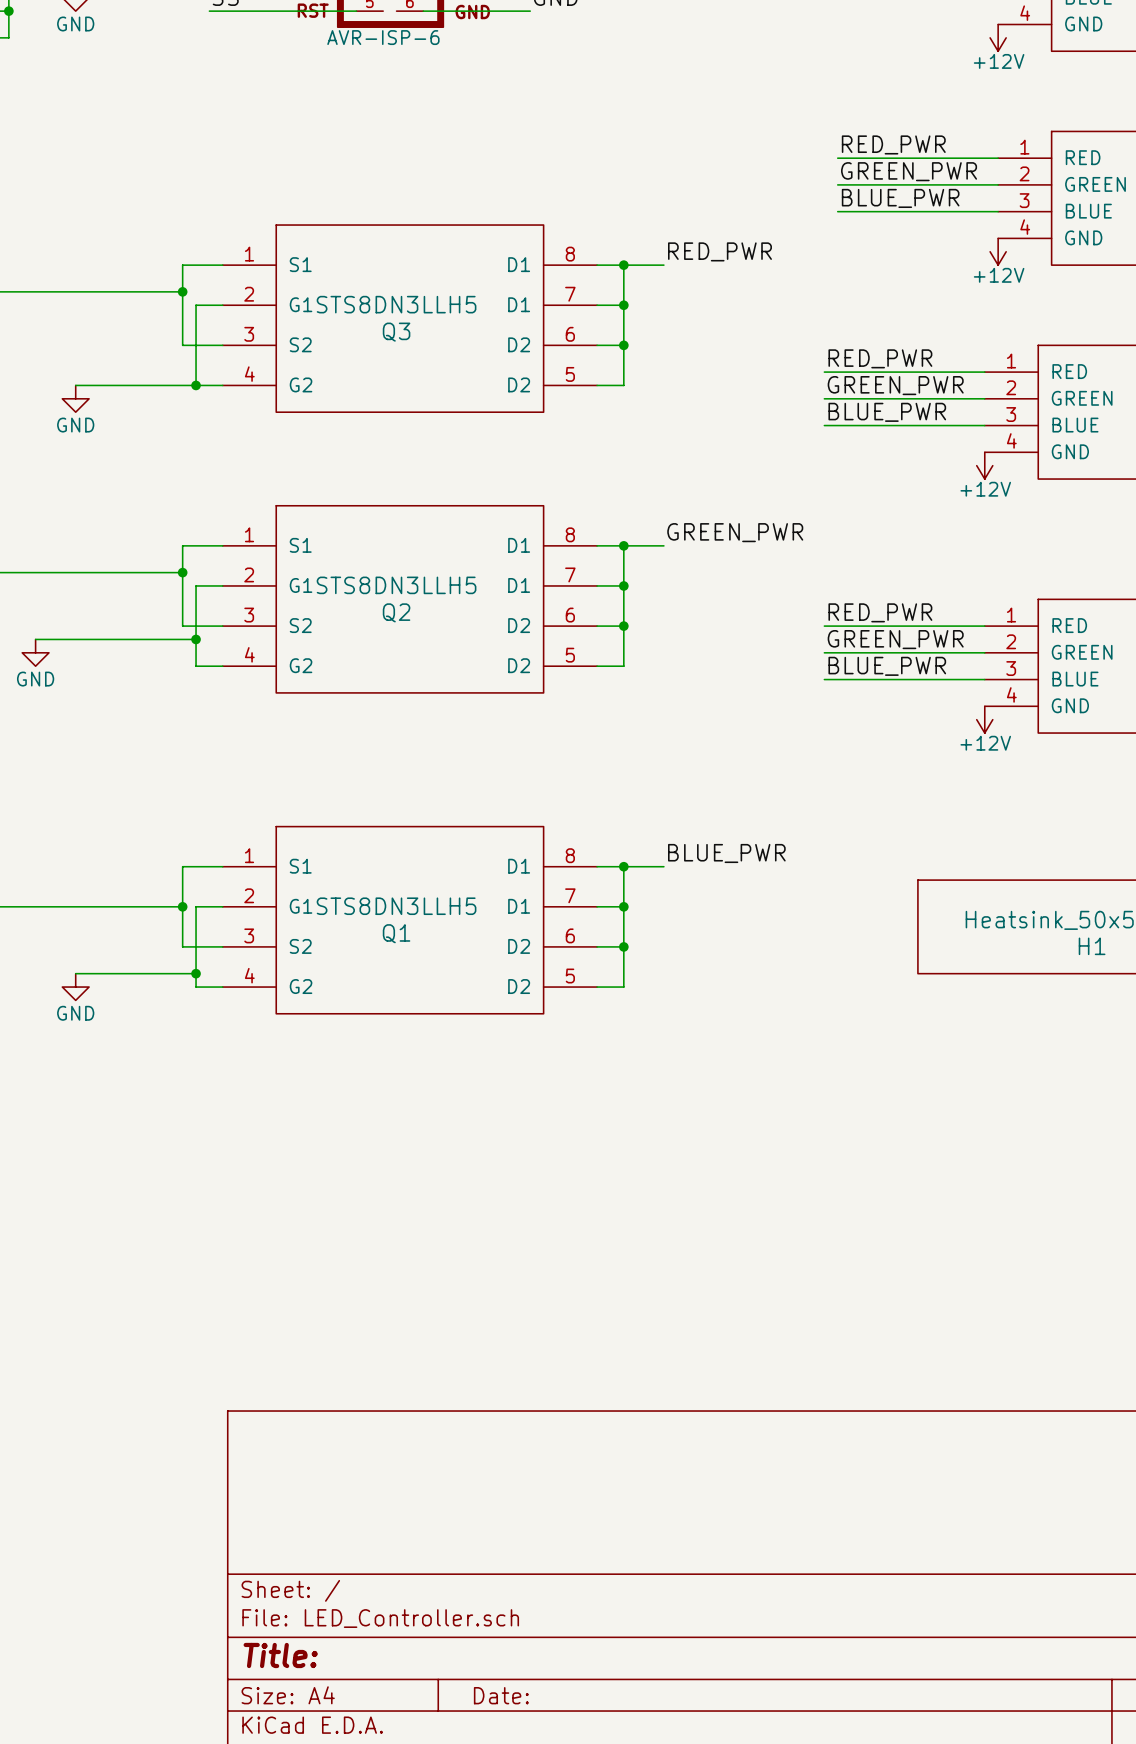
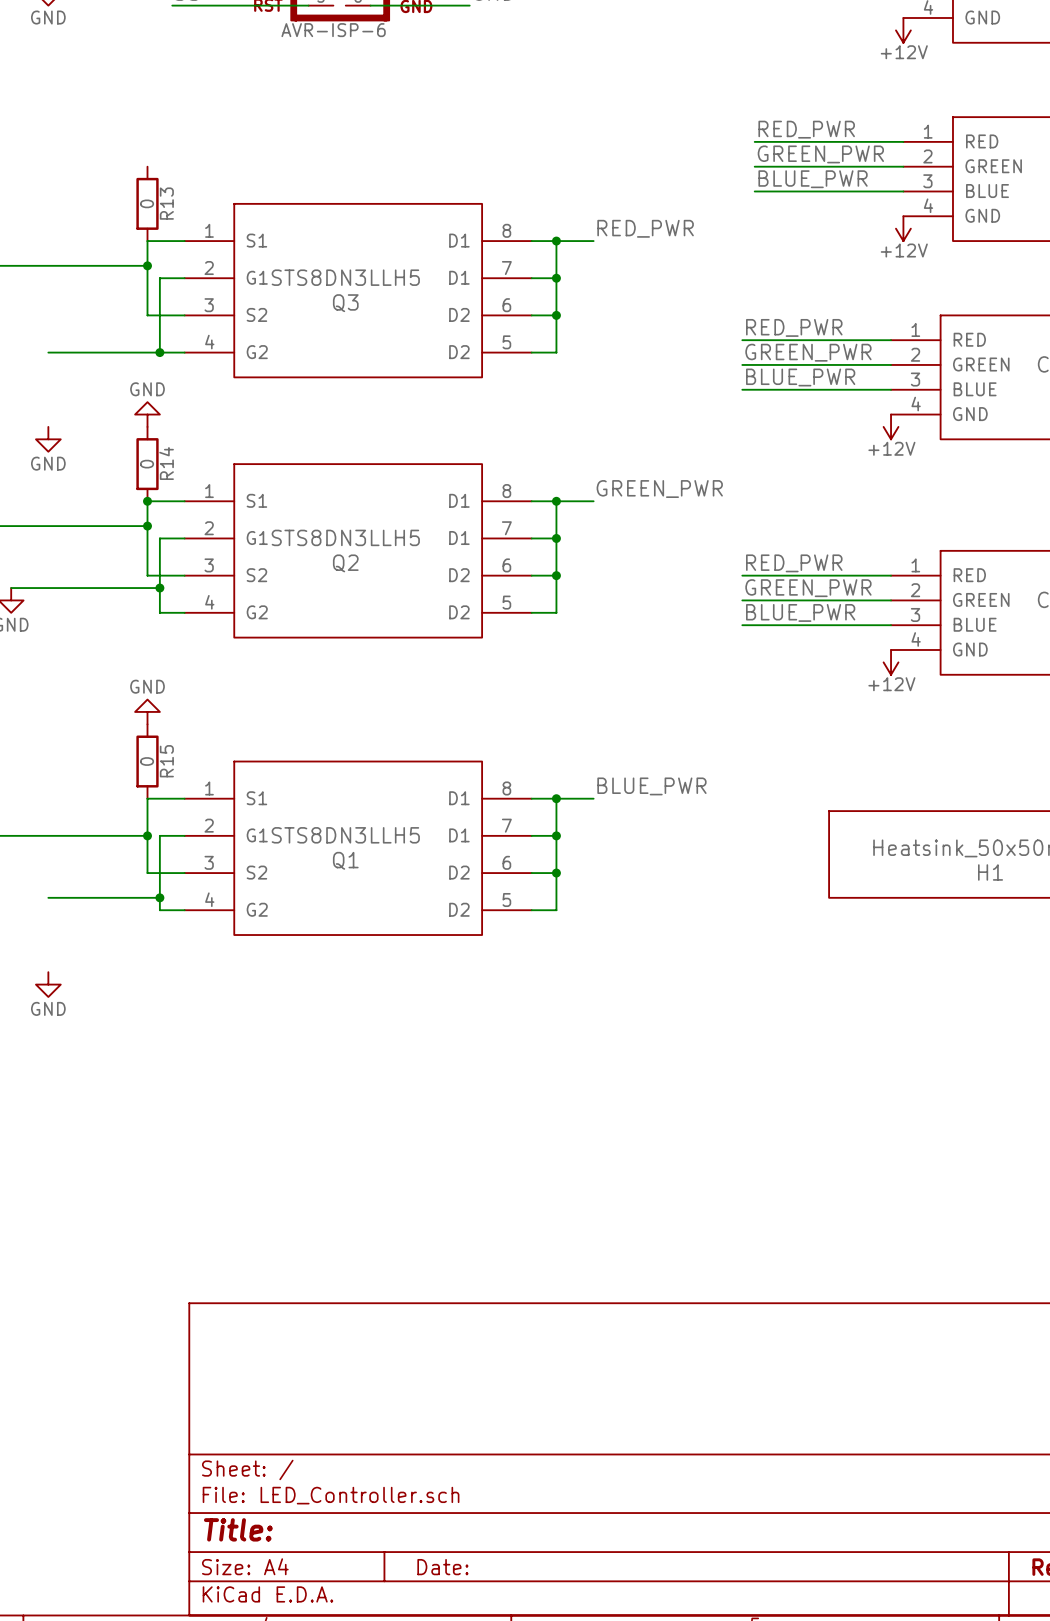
R13: none -> 0 (147, 203)
power symbol: GND (75, 398) -> none
power symbol: none -> GND (147, 414)
power symbol: none -> GND (48, 439)
R14: none -> 0 (147, 464)
junction: none -> (147, 501)
power symbol: none -> GND (147, 711)
R15: none -> 0 (147, 761)
power symbol: GND (75, 987) -> none
power symbol: none -> GND (48, 984)

